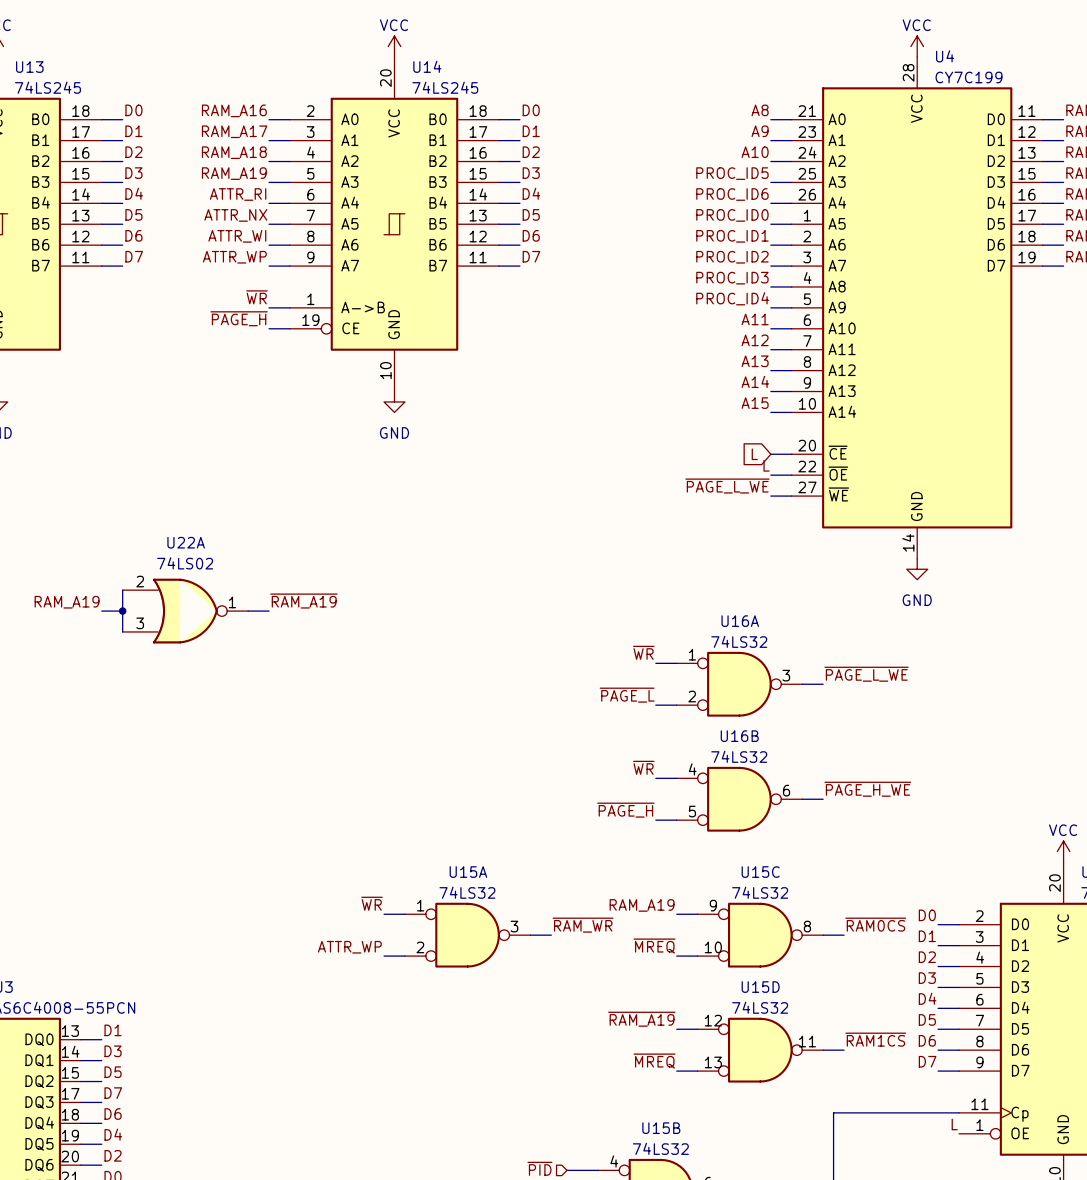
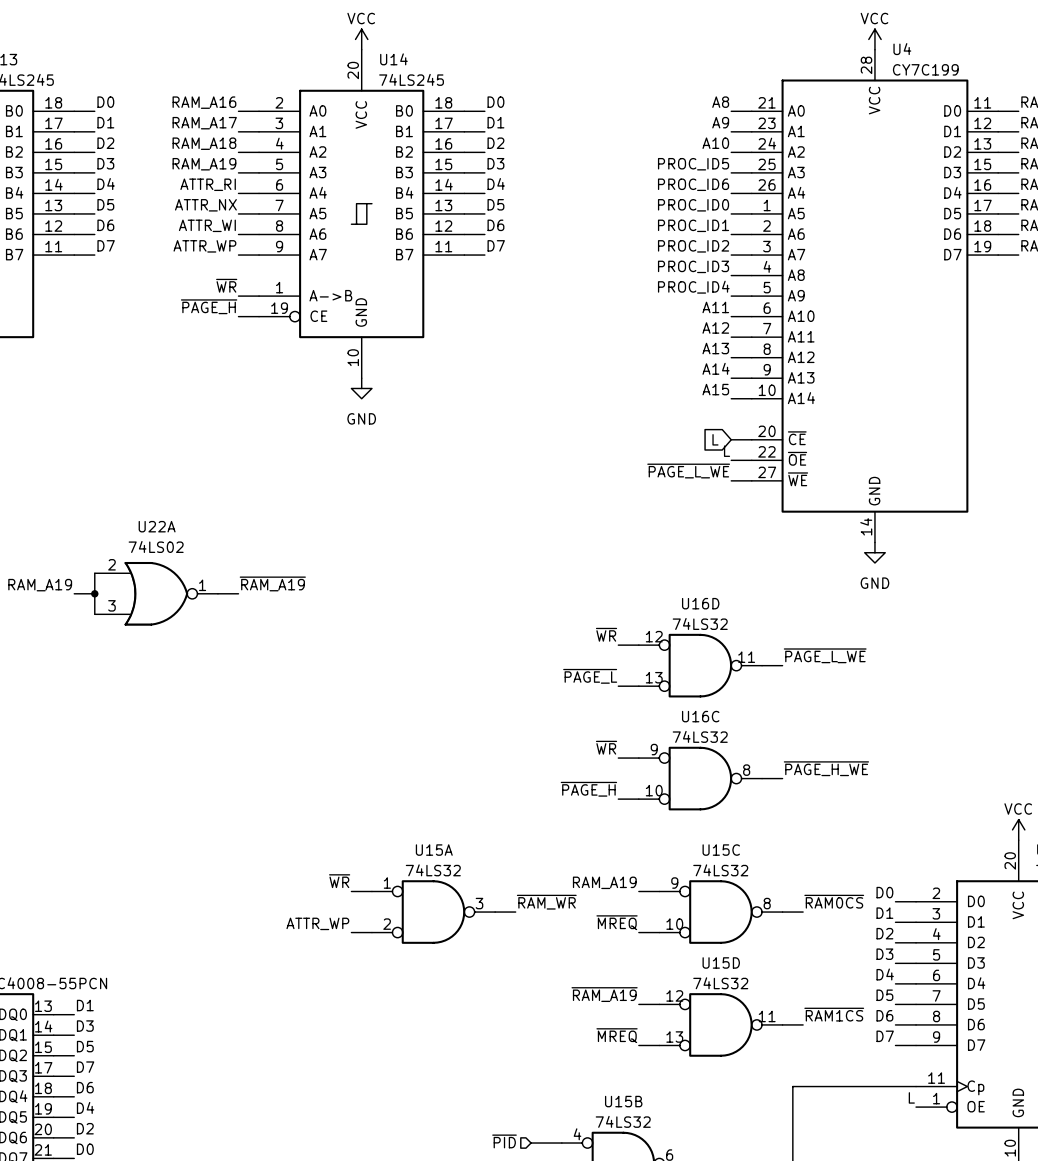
U16A name: U16A (740, 621) -> U16D (700, 603)
U16A pin number: 1 (692, 654) -> 12 (654, 636)
U16A pin number: 3 (786, 675) -> 11 (746, 657)
U16A pin number: 2 (692, 696) -> 13 (654, 677)
U16B name: U16B (739, 736) -> U16C (700, 716)
U16B pin number: 4 (692, 769) -> 9 (654, 749)
U16B pin number: 6 (786, 790) -> 8 (746, 770)
U16B pin number: 5 (692, 811) -> 10 (654, 790)

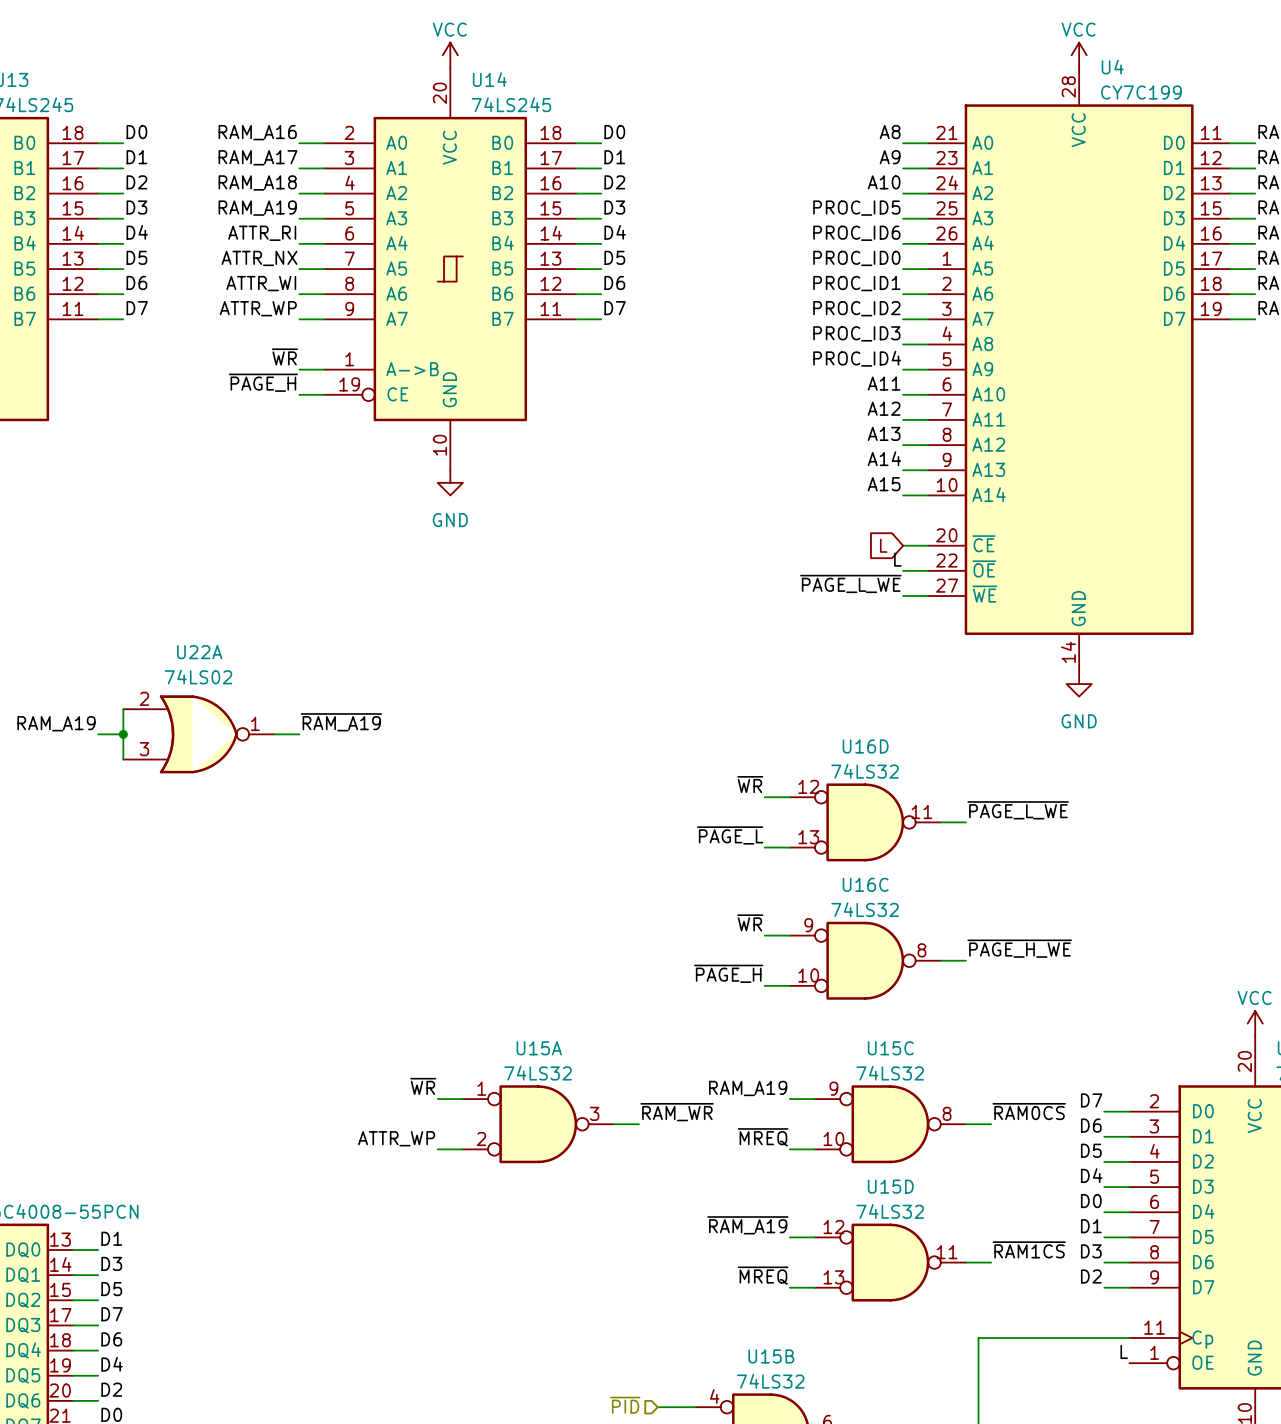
label: D0 (884, 892) -> D7 (1091, 1100)
label: D1 (884, 913) -> D6 (1091, 1125)
label: D2 (884, 933) -> D5 (1091, 1150)
label: D3 (884, 954) -> D4 (1091, 1175)
label: D4 (885, 974) -> D0 (1091, 1201)
label: D5 (884, 995) -> D1 (1091, 1226)
label: D6 (884, 1015) -> D3 (1091, 1251)
label: D7 (885, 1036) -> D2 (1091, 1276)

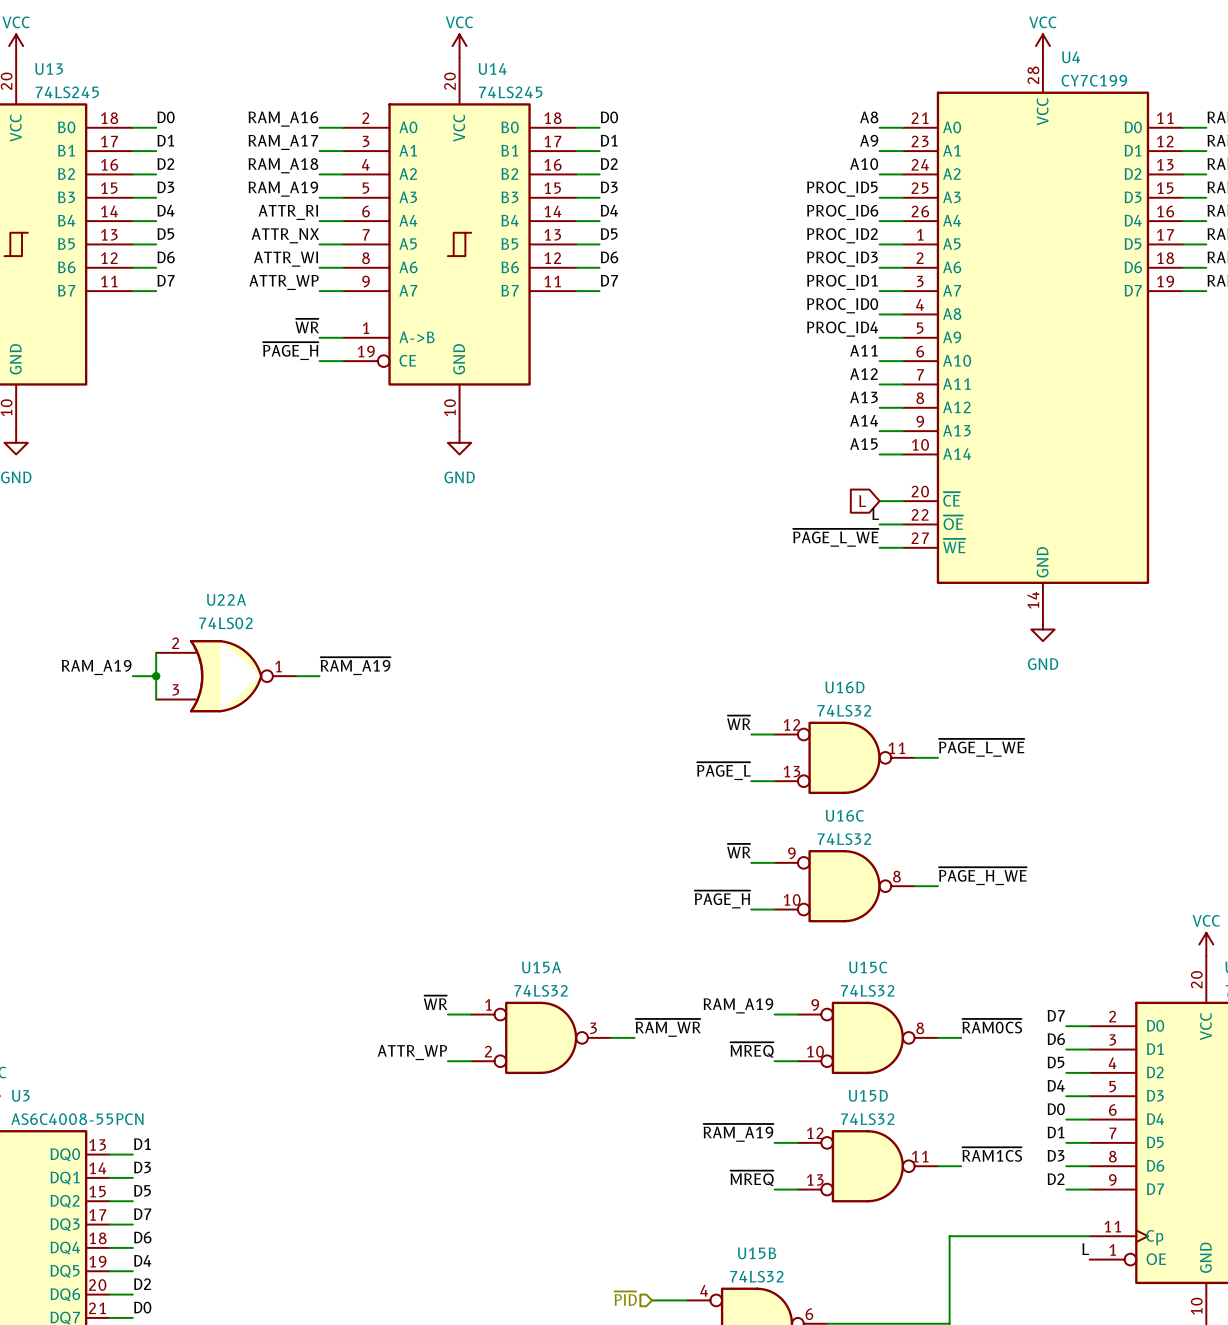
label: PROC_ID0 (856, 258) -> PROC_ID2 (842, 235)
label: PROC_ID1 (856, 283) -> PROC_ID3 (842, 259)
label: PROC_ID2 (856, 308) -> PROC_ID1 (842, 282)
label: PROC_ID3 (856, 333) -> PROC_ID0 (842, 305)

